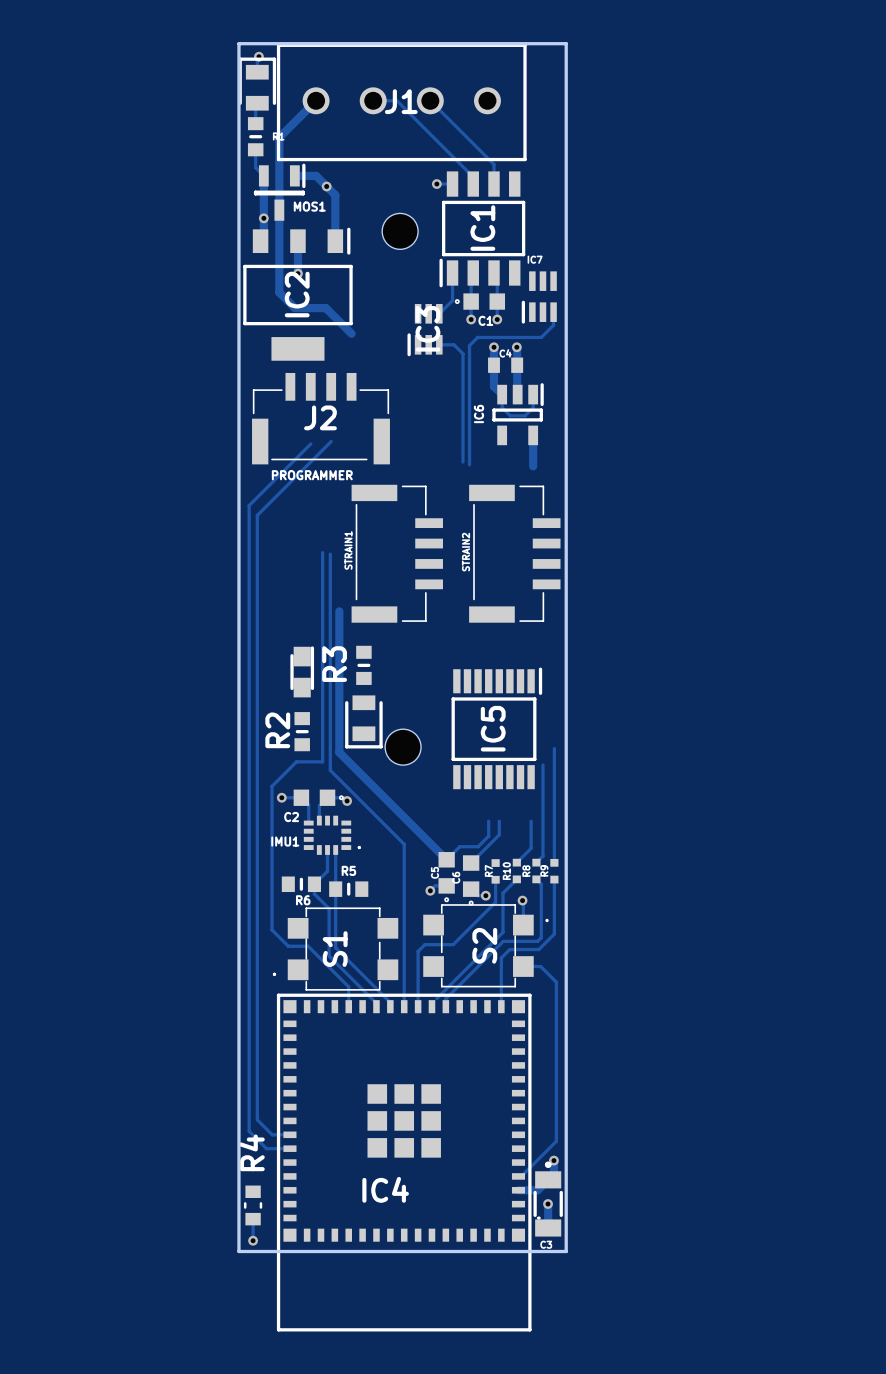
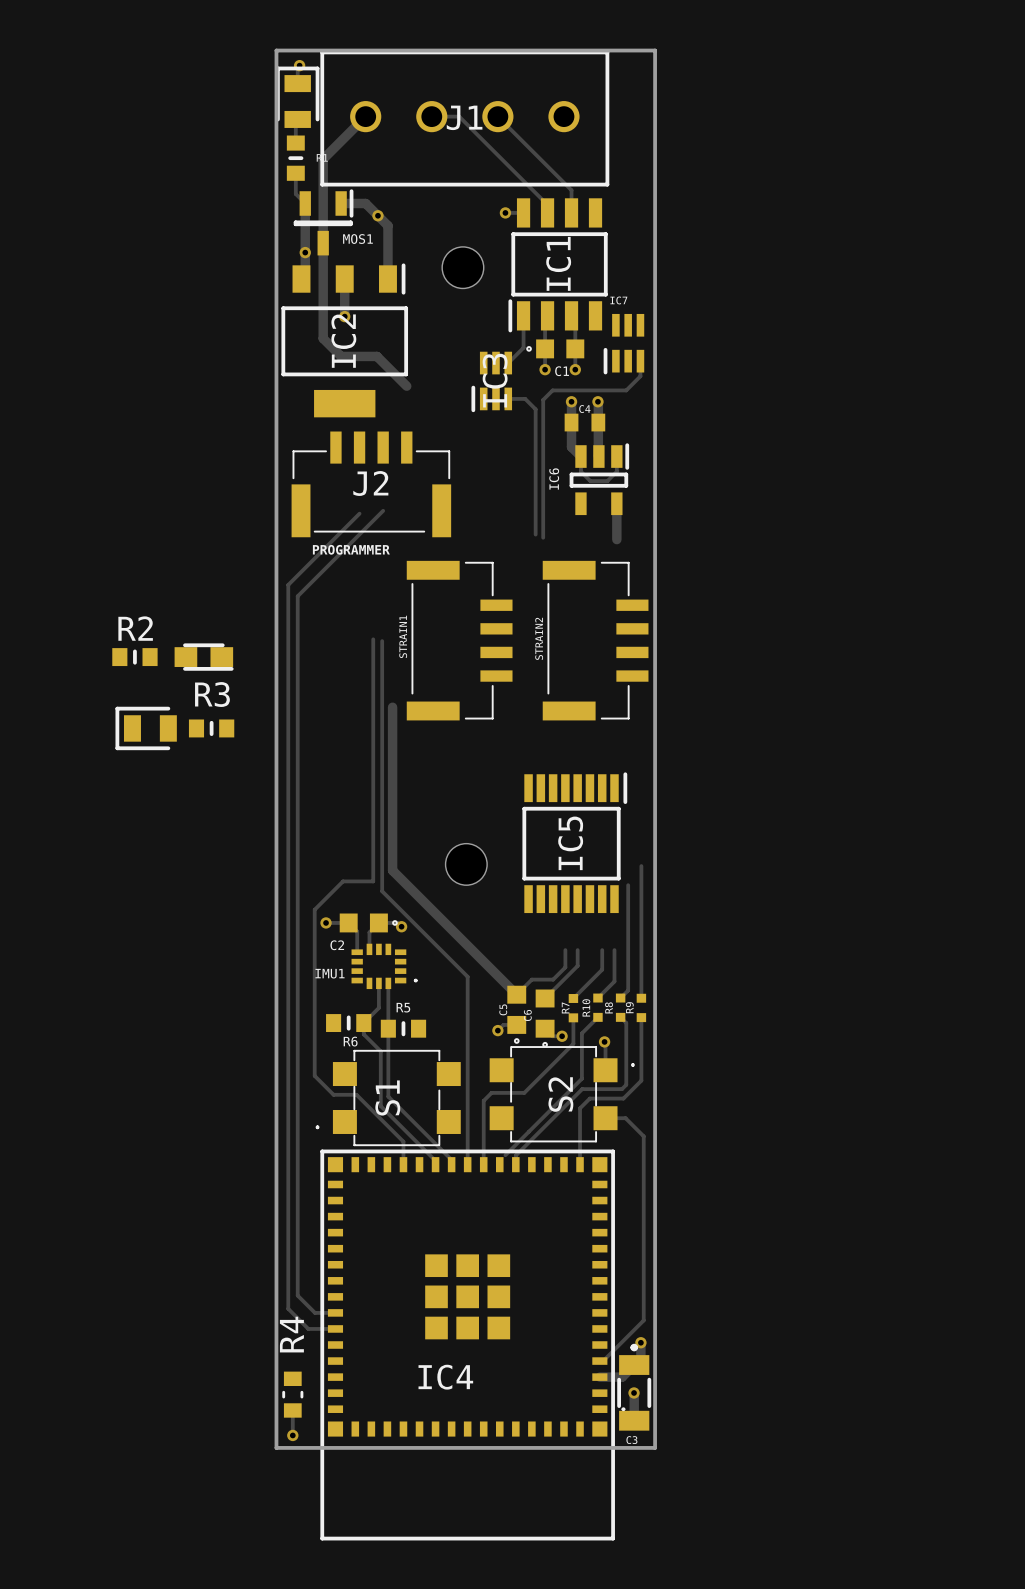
R3 rotation: 0° (363, 665) -> 90° clockwise (211, 728)
R3 position: (363, 665) -> (211, 728)
part rotation: 0° (302, 671) -> 90° clockwise (204, 657)
part position: (302, 671) -> (204, 657)
part rotation: 0° (363, 721) -> 90° clockwise (146, 728)
part position: (363, 721) -> (146, 728)
R2 rotation: 0° (302, 731) -> 90° clockwise (134, 657)
R2 position: (302, 731) -> (134, 657)
track: none -> (602, 950) (602, 969) (573, 998)

